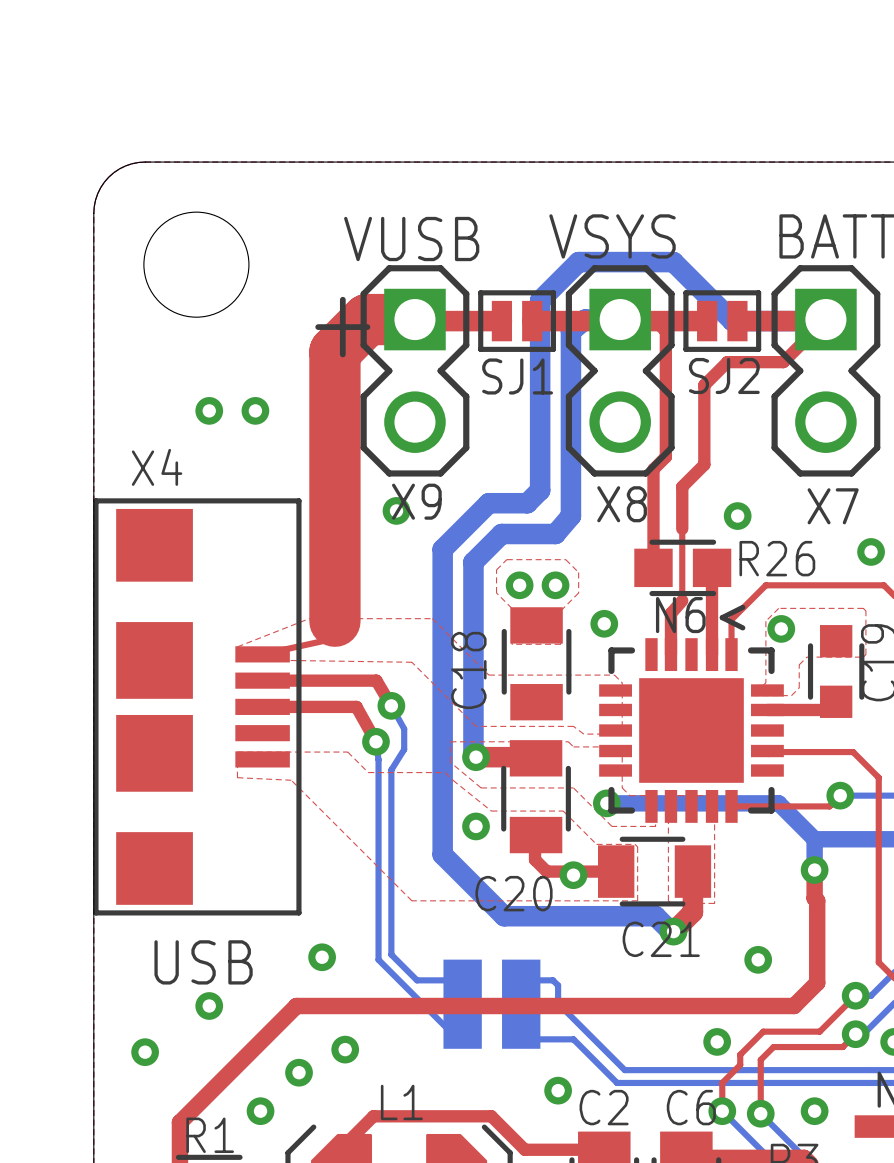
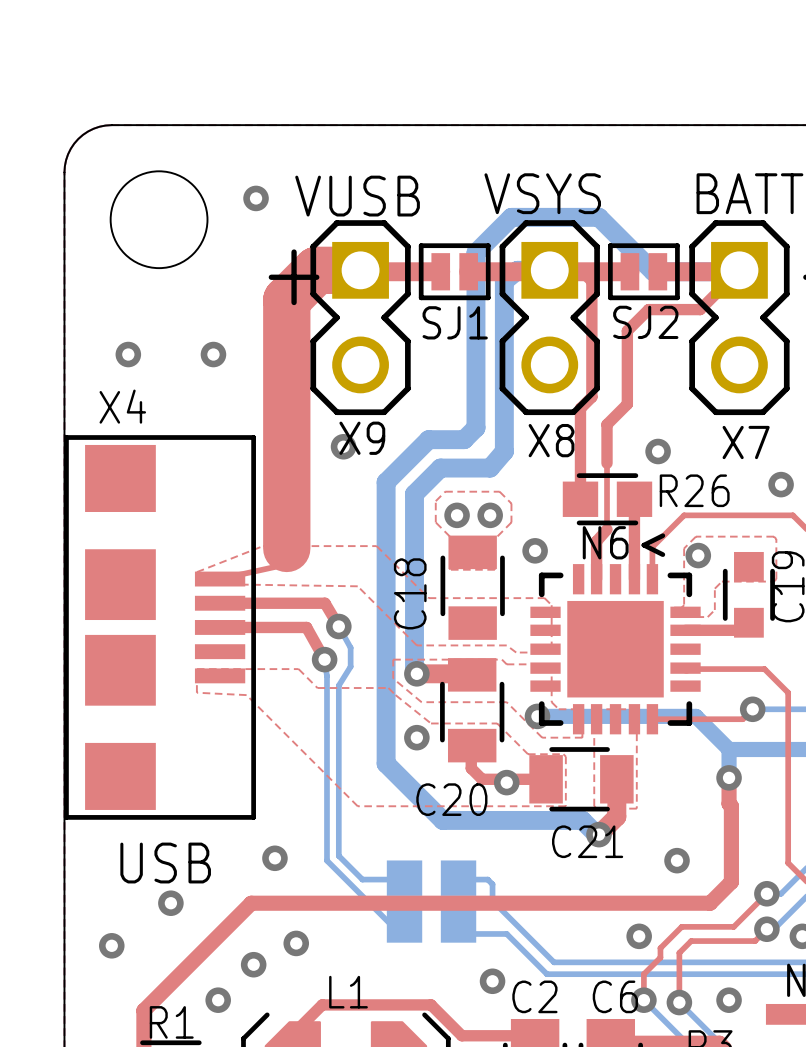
via: none -> (256, 198)
via position: (209, 410) -> (128, 354)

